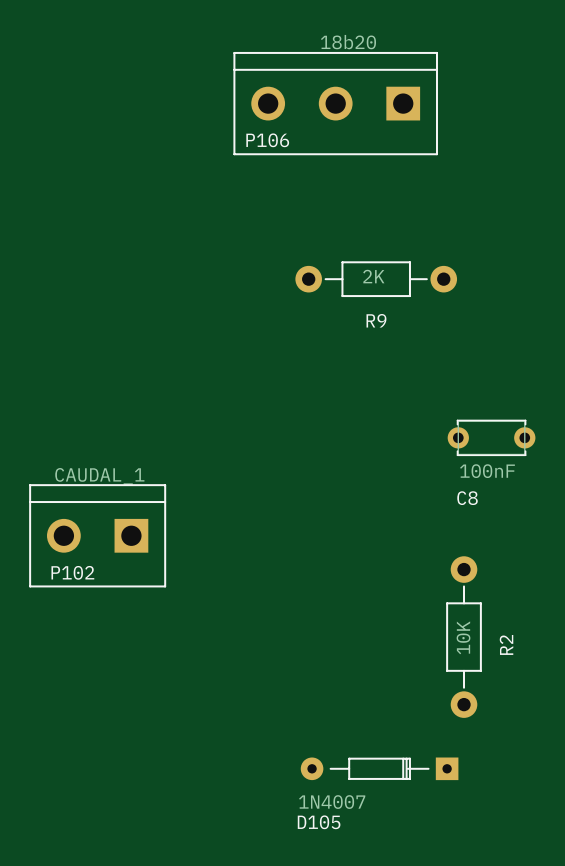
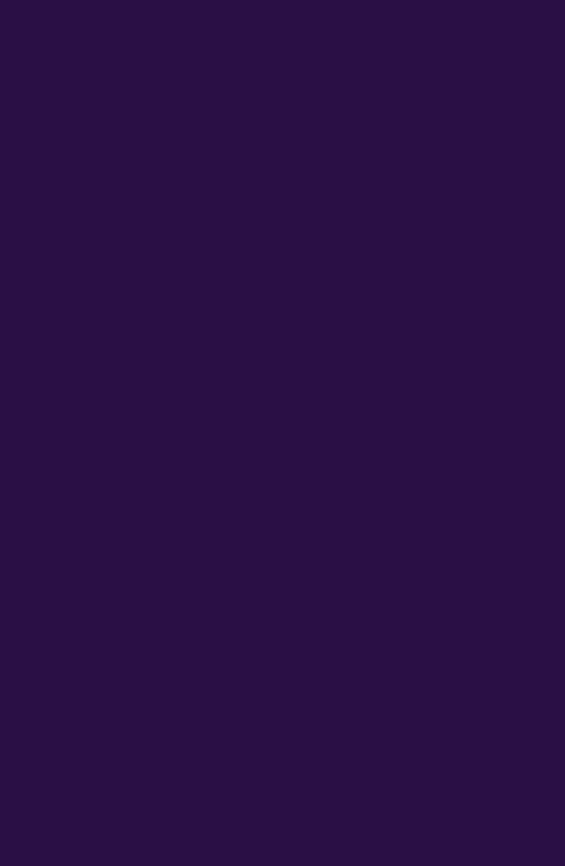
P106: 18b20 (335, 103) -> none
R9: 2K (376, 279) -> none
C8: 100nF (491, 437) -> none
P102: CAUDAL_1 (97, 535) -> none
R2: 10K (464, 637) -> none
D105: 1N4007 (379, 768) -> none

